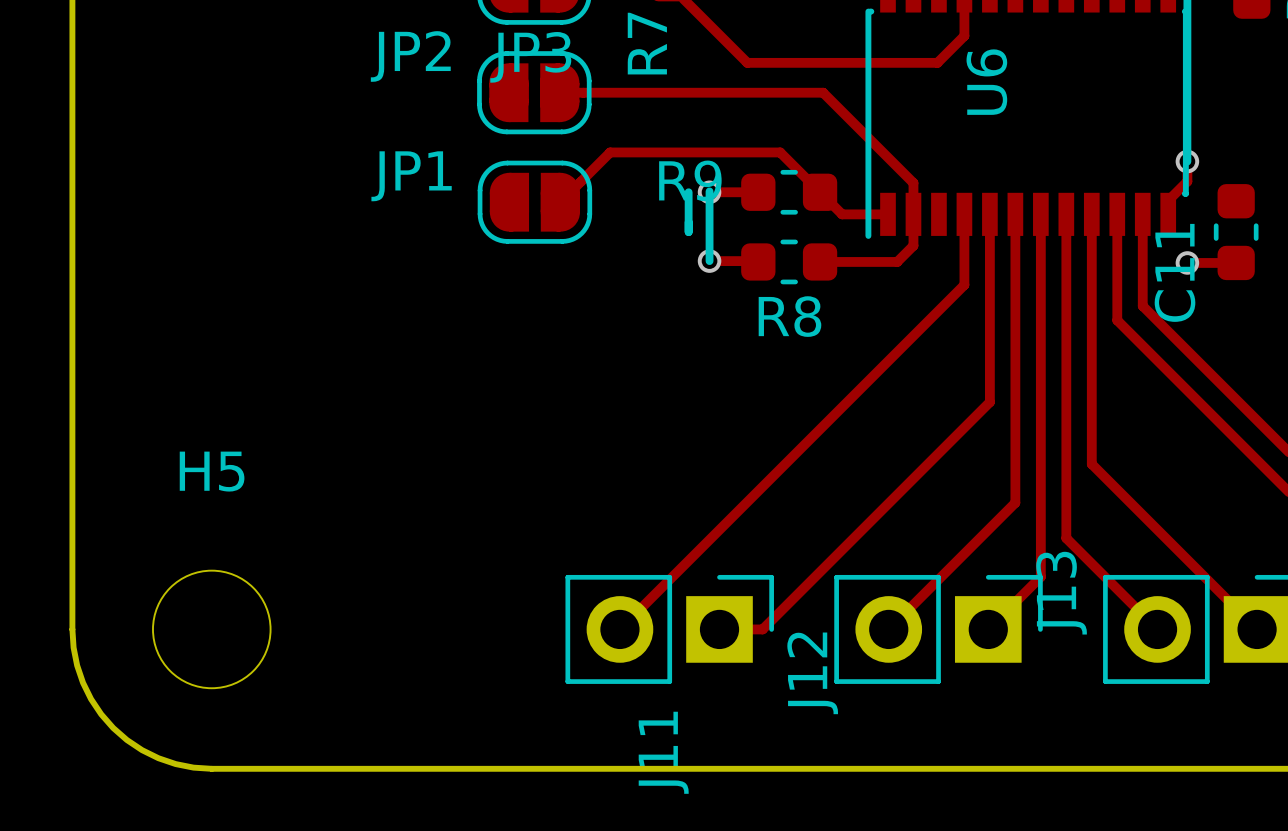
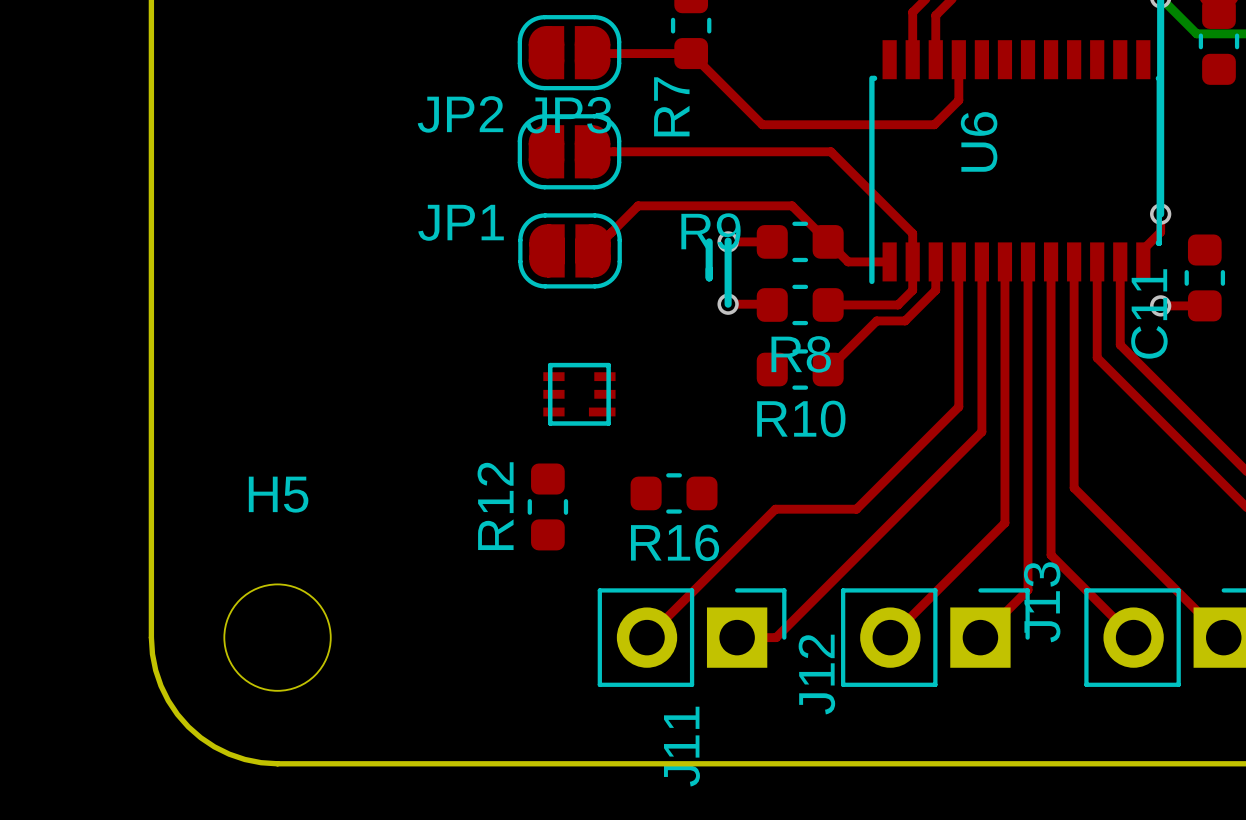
top track: none -> (935, 261) (935, 290) (905, 320) (876, 320) (828, 369)
top track: (964, 284) (761, 487) -> (958, 325) (958, 406) (856, 509) (775, 509)
R10: none -> (800, 369)
part: none -> (579, 394)
R16: none -> (674, 493)
R12: none -> (547, 506)

